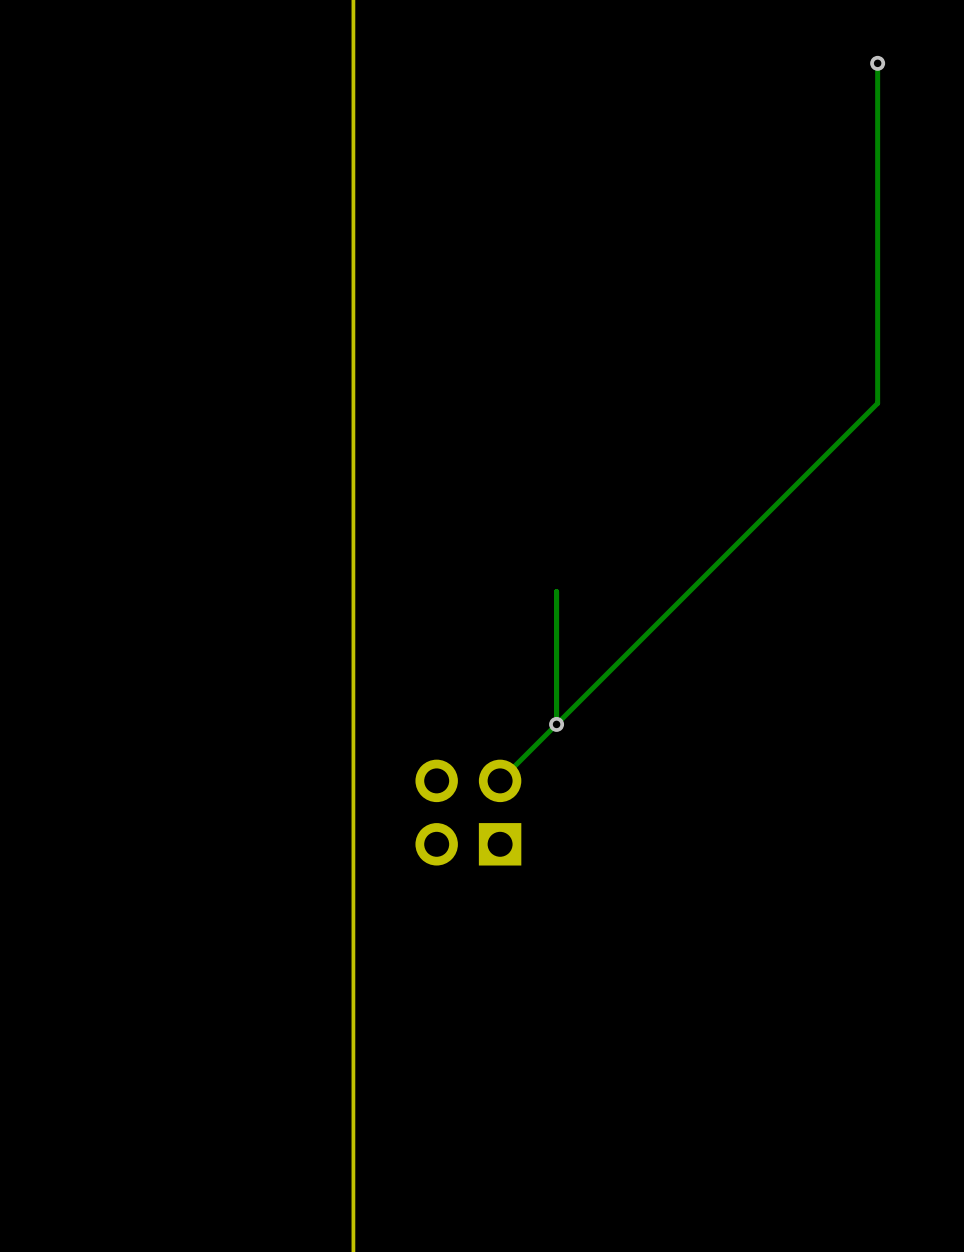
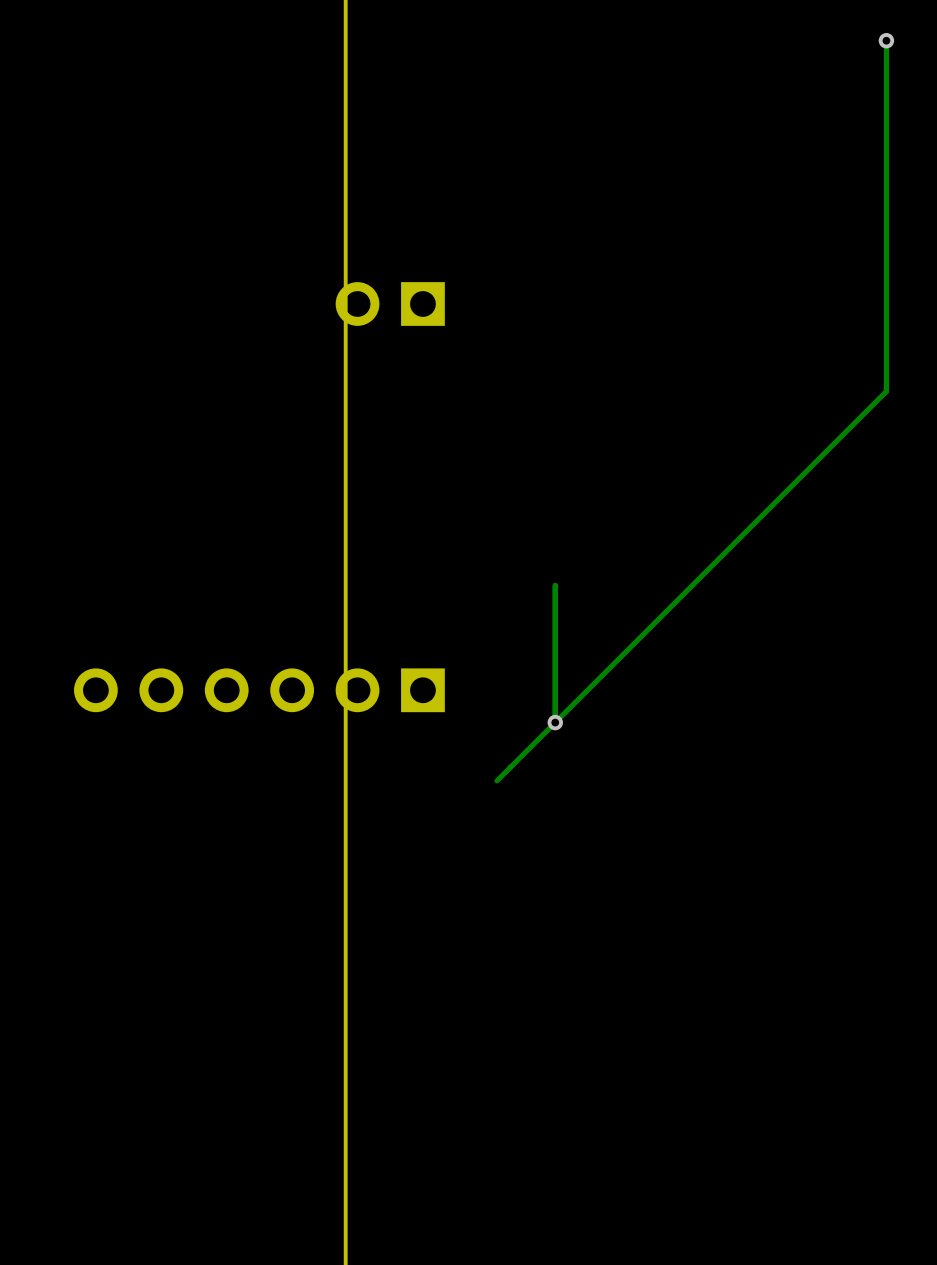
part: none -> (390, 303)
part: none -> (259, 690)
part: (468, 812) -> none

